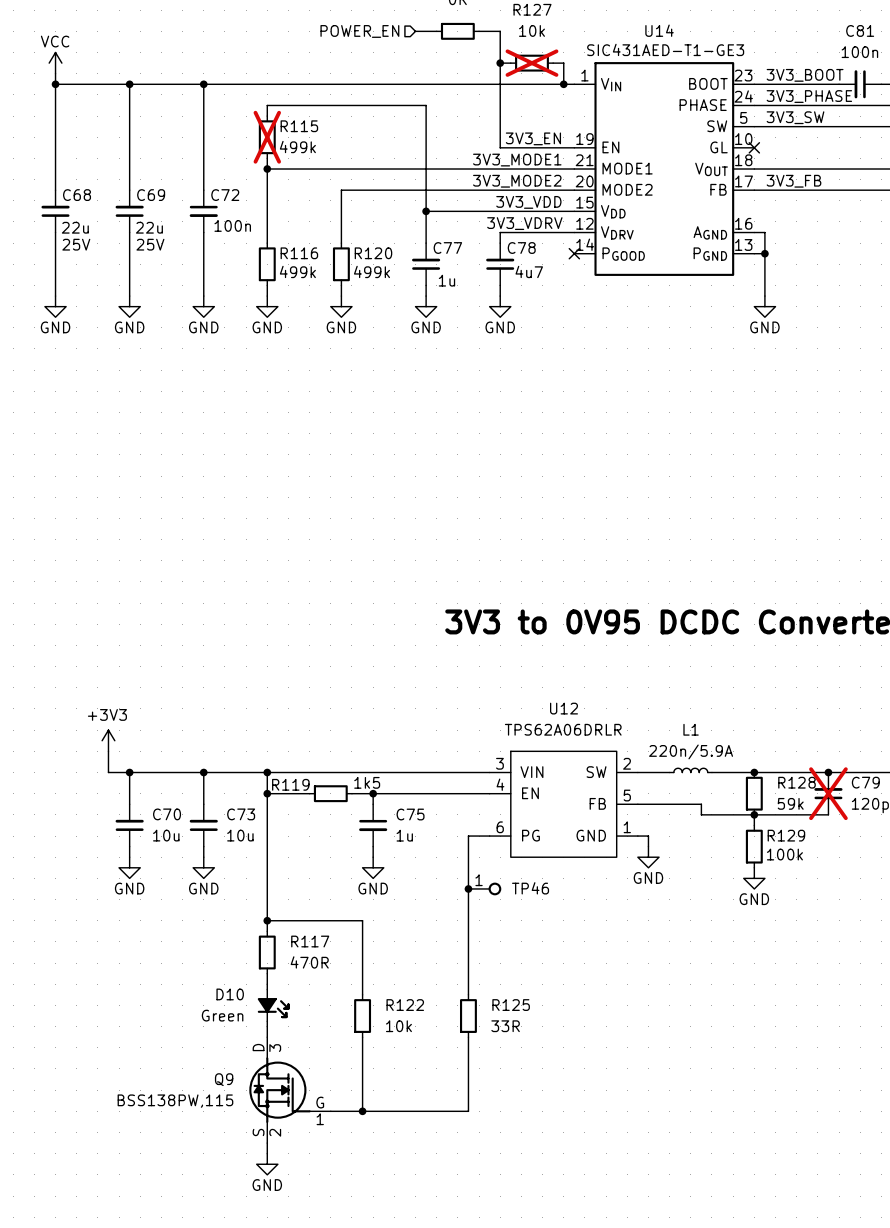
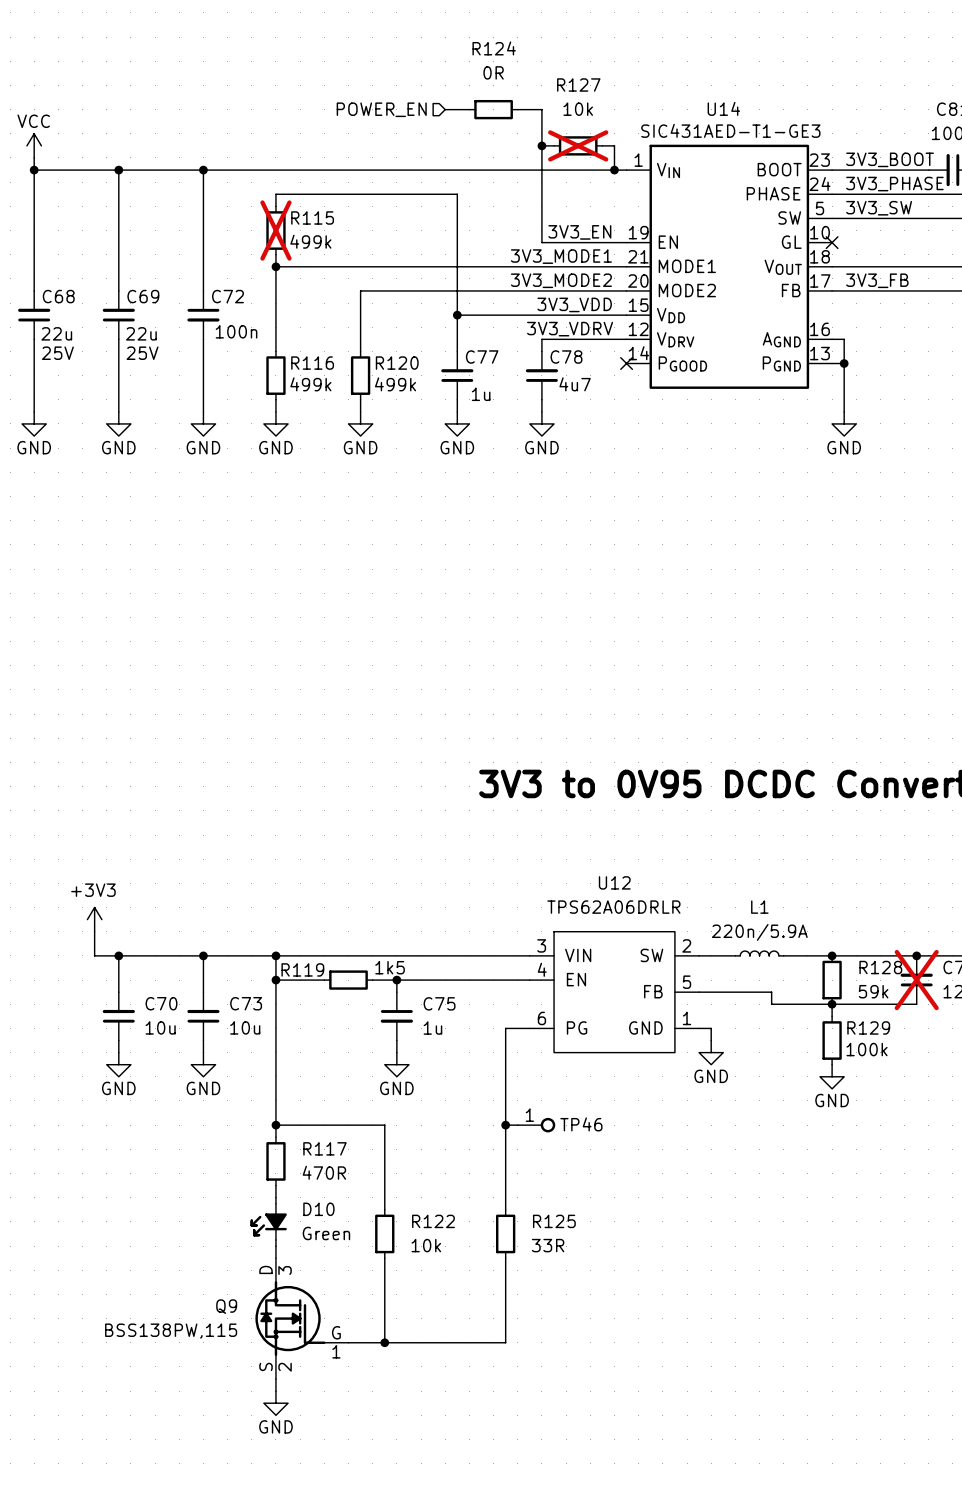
junction position: (468, 888) -> (505, 1125)
TP46 position: (484, 888) -> (536, 1125)
TP46 name position: TP46 (530, 888) -> TP46 (581, 1124)
wire: none -> (505, 1125) (517, 1125)
D10 flip: as is (273, 1005) -> left-right (268, 1221)

